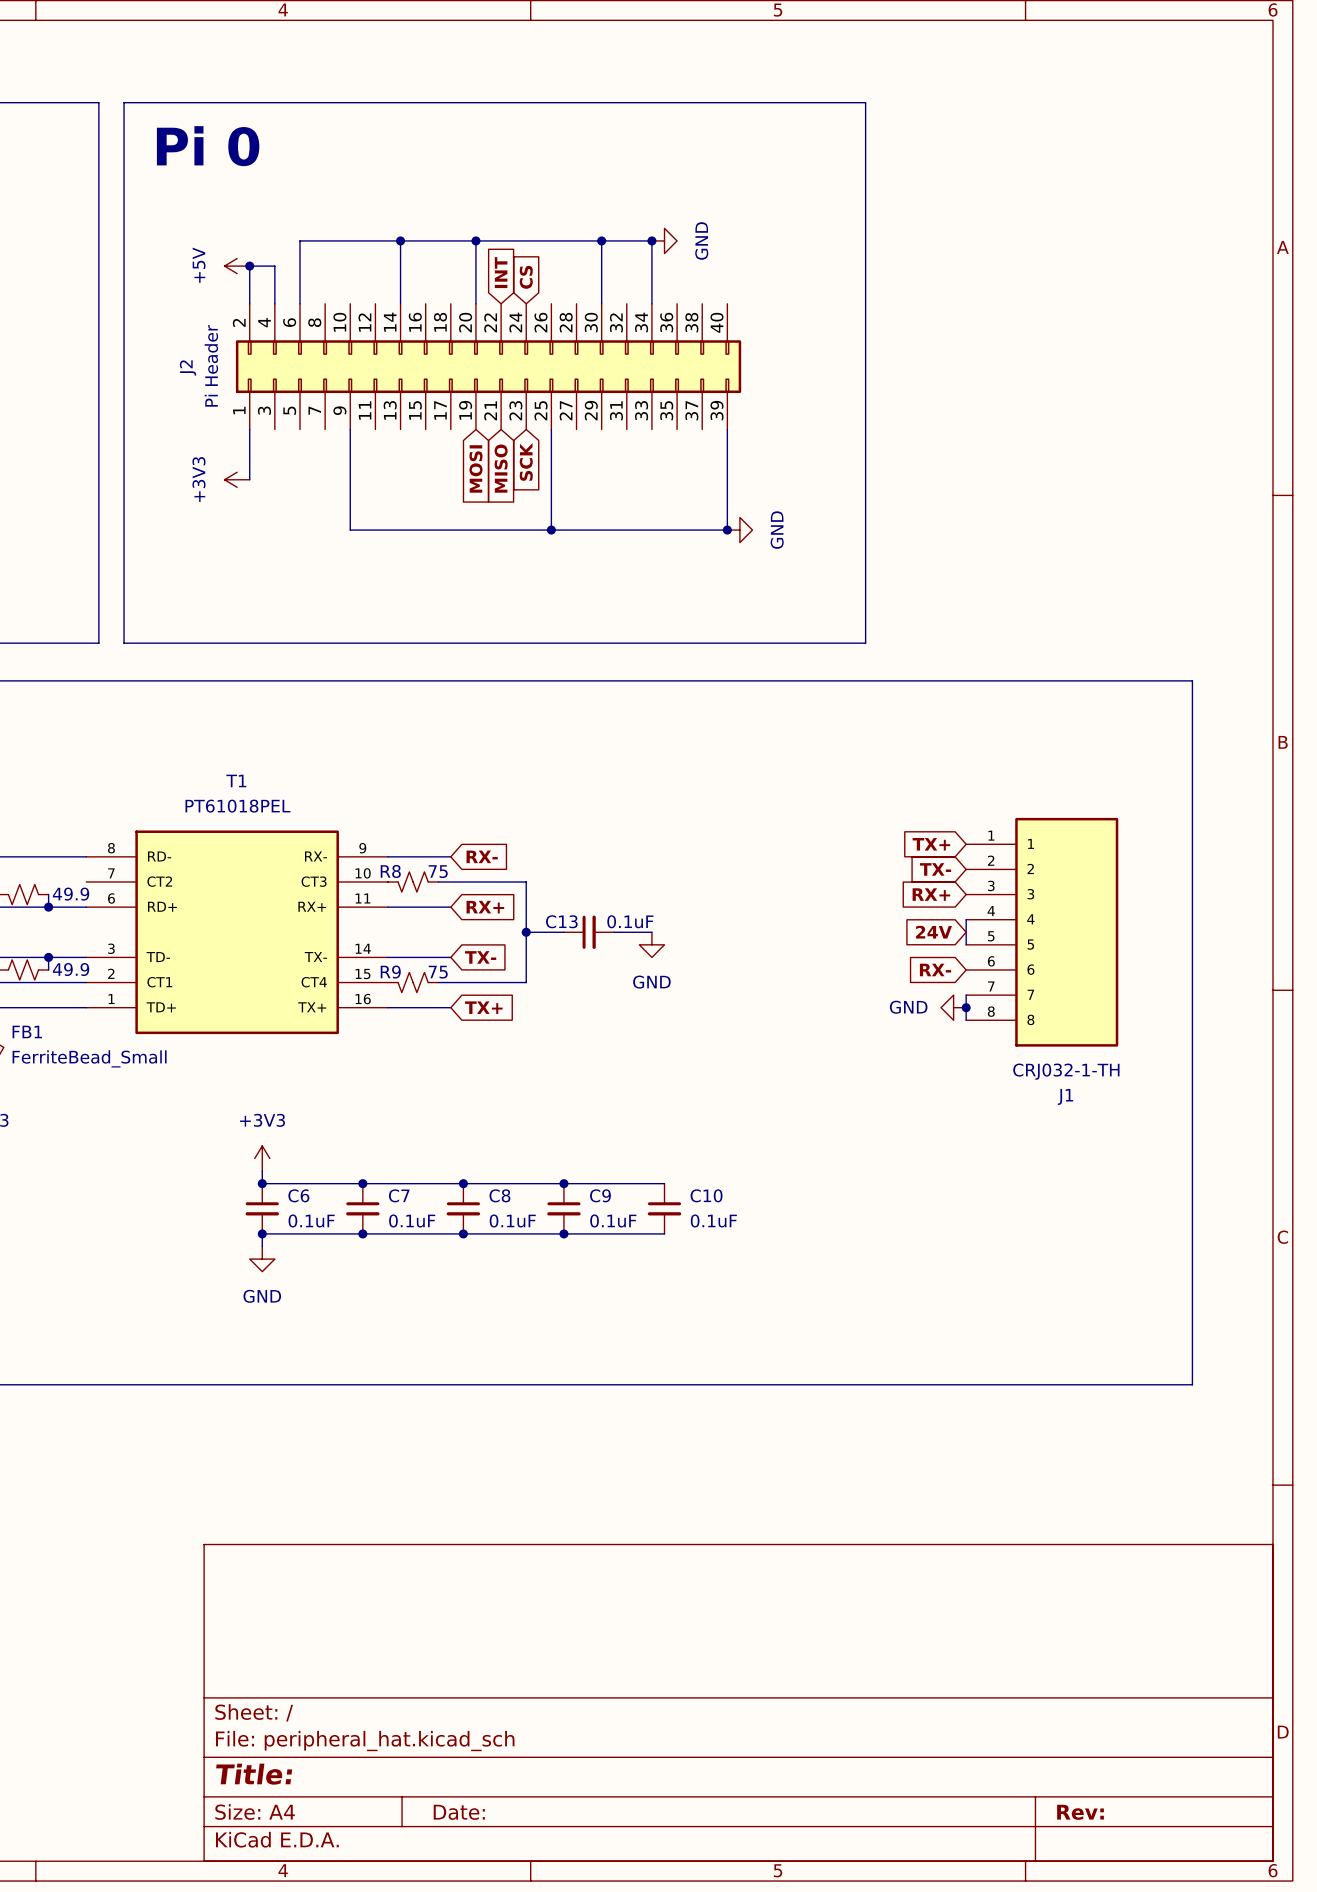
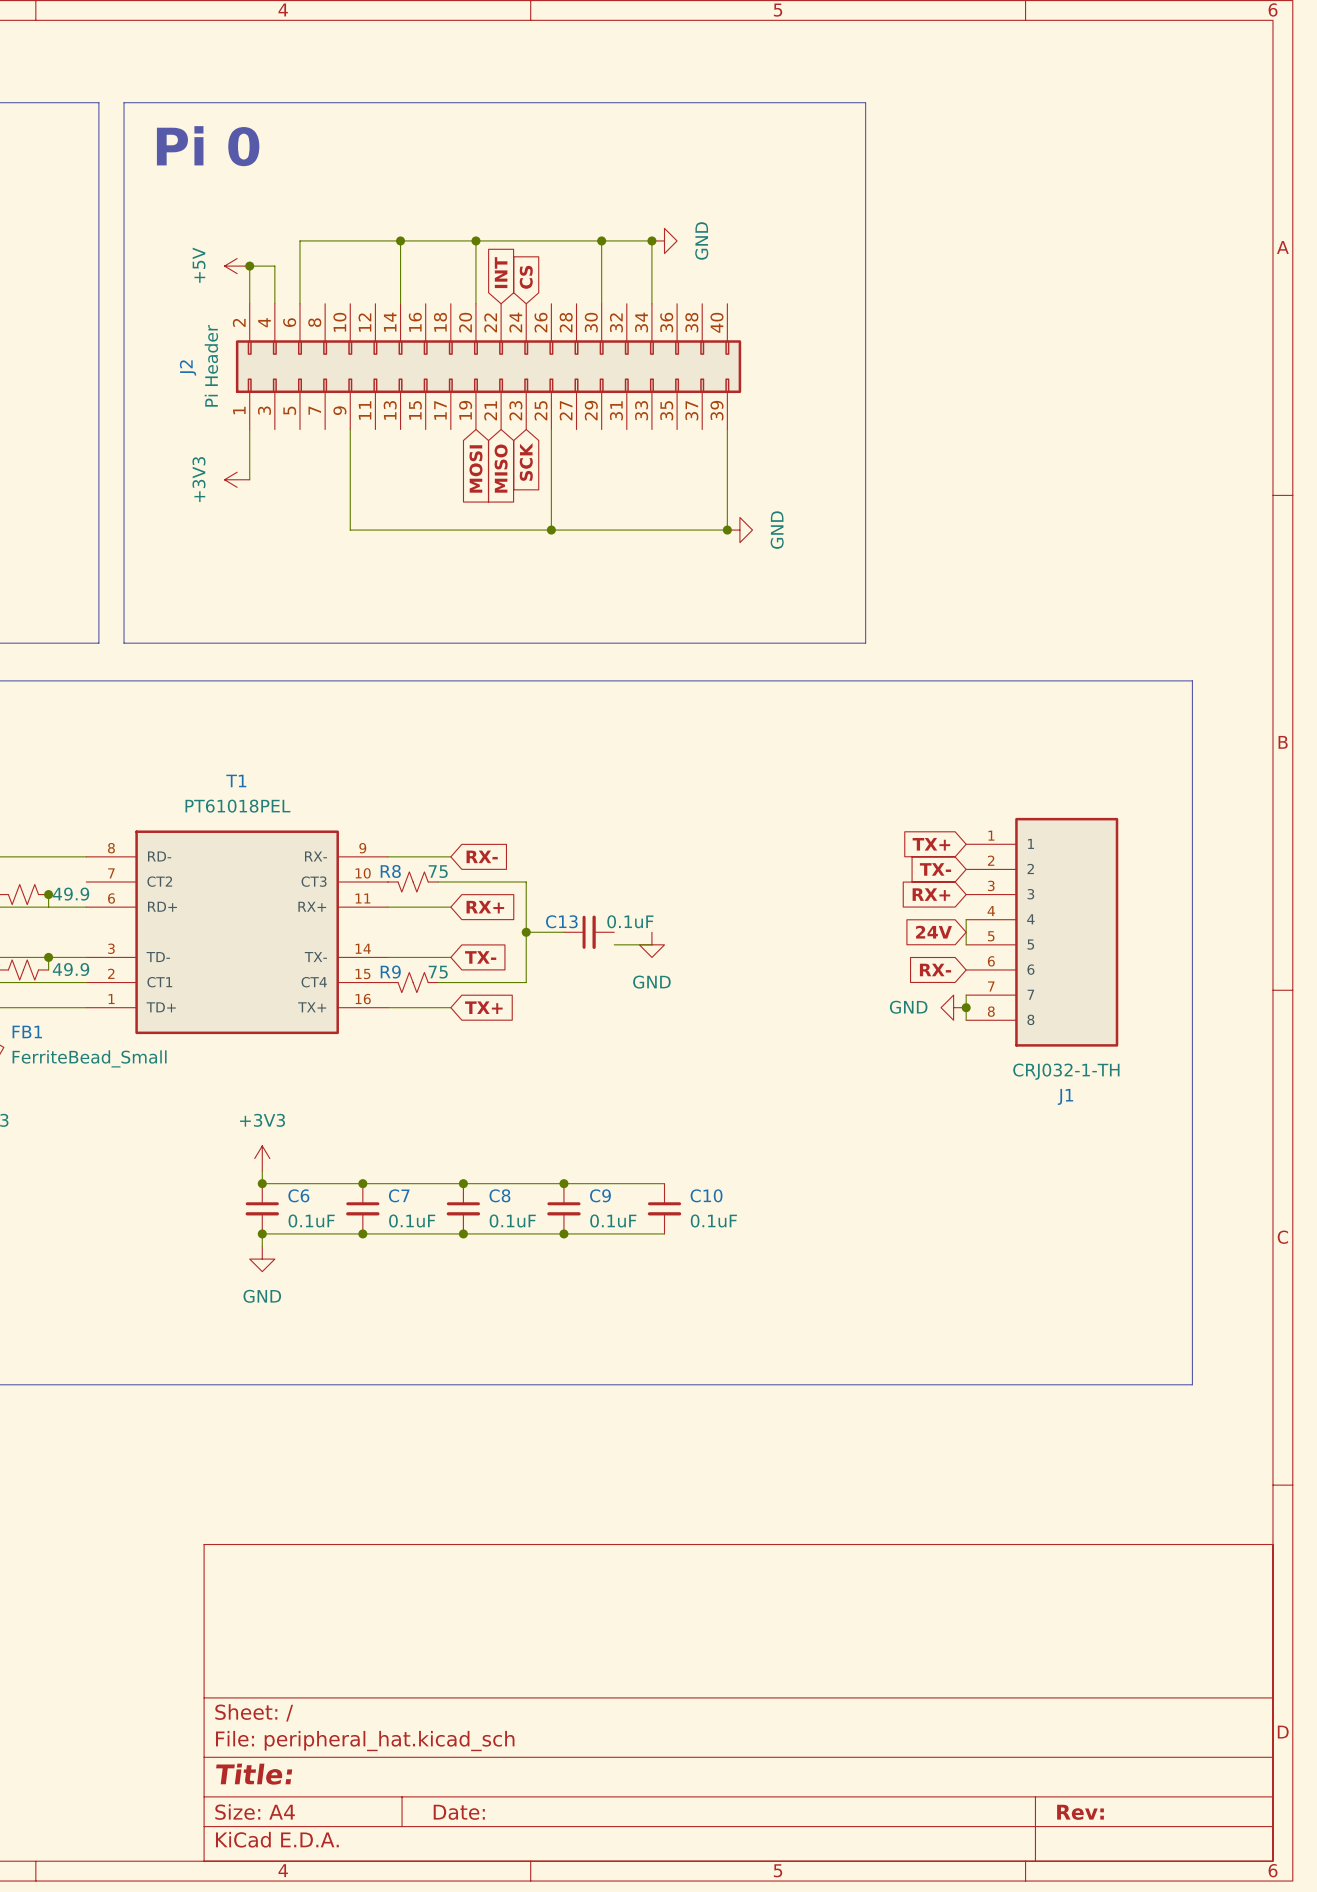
junction position: (48, 907) -> (48, 894)
wire: (614, 932) (651, 932) -> (614, 944) (651, 944)

